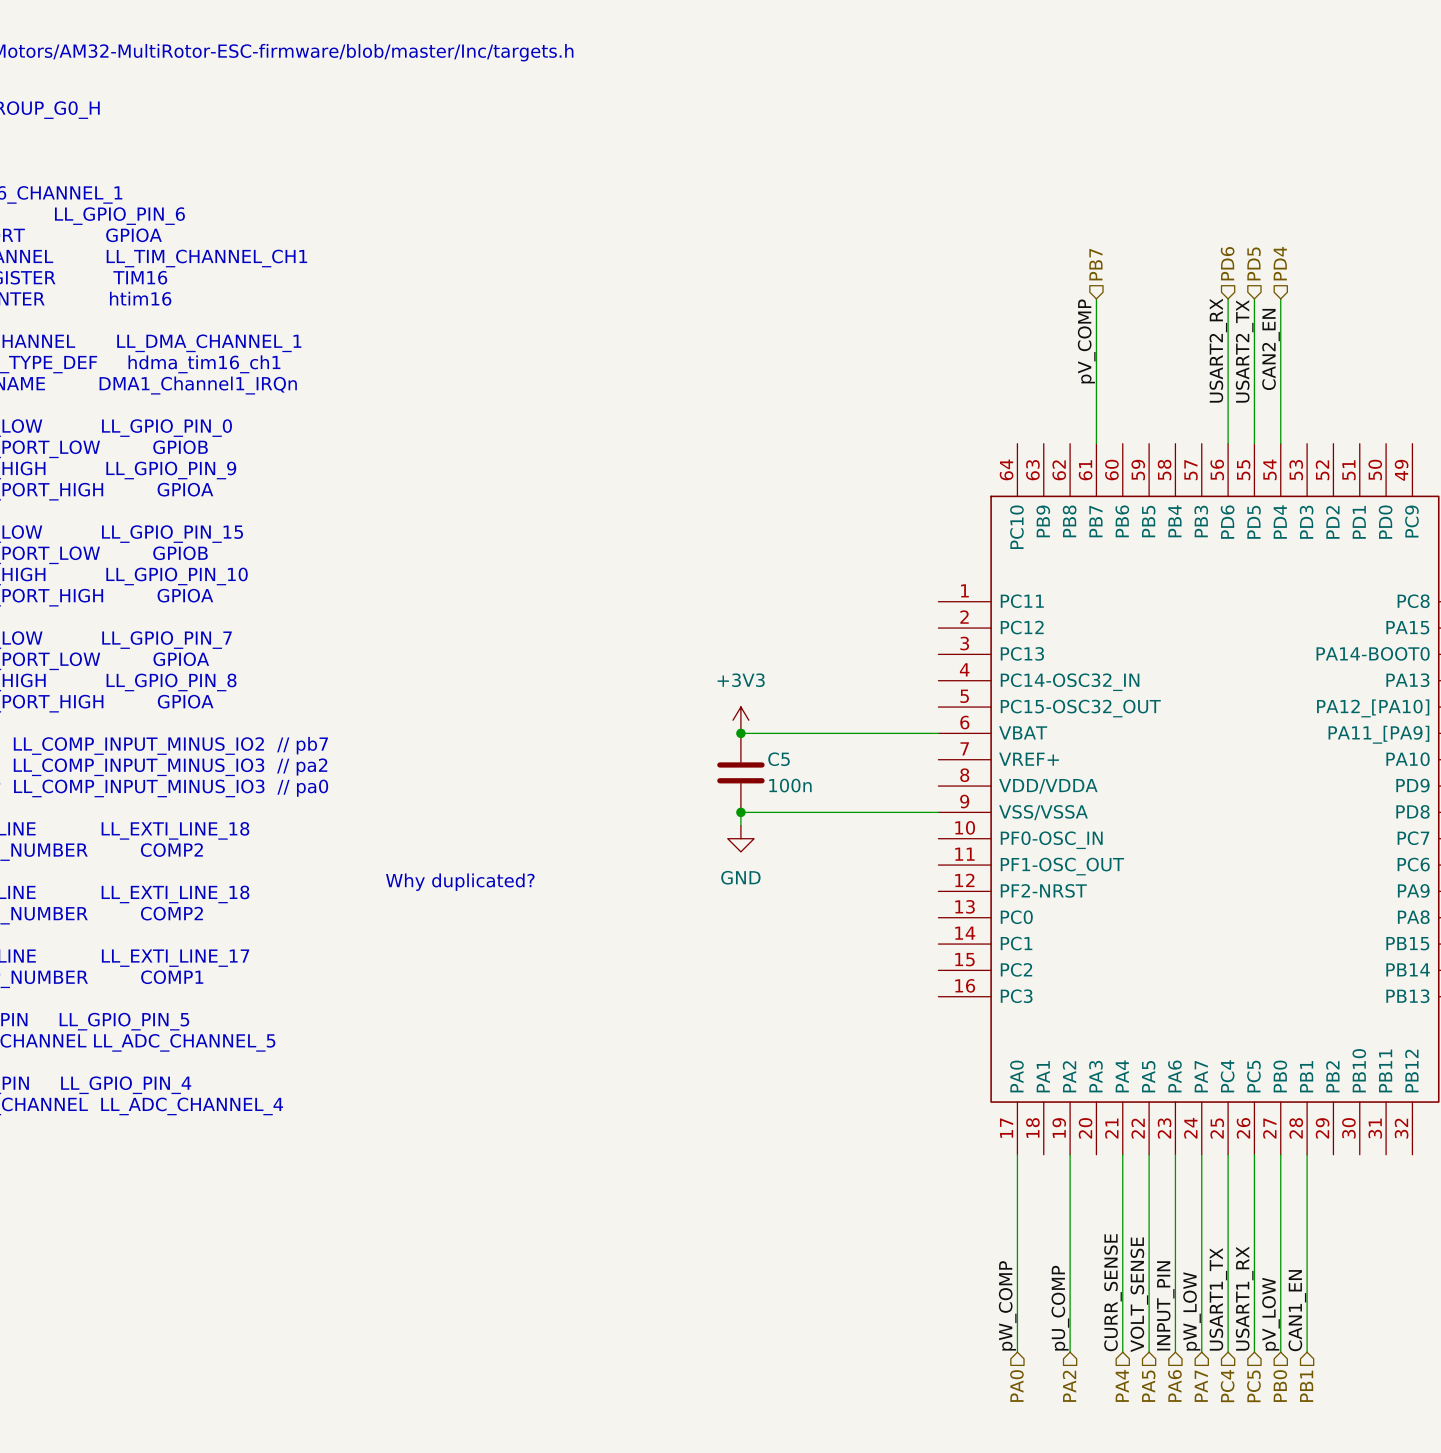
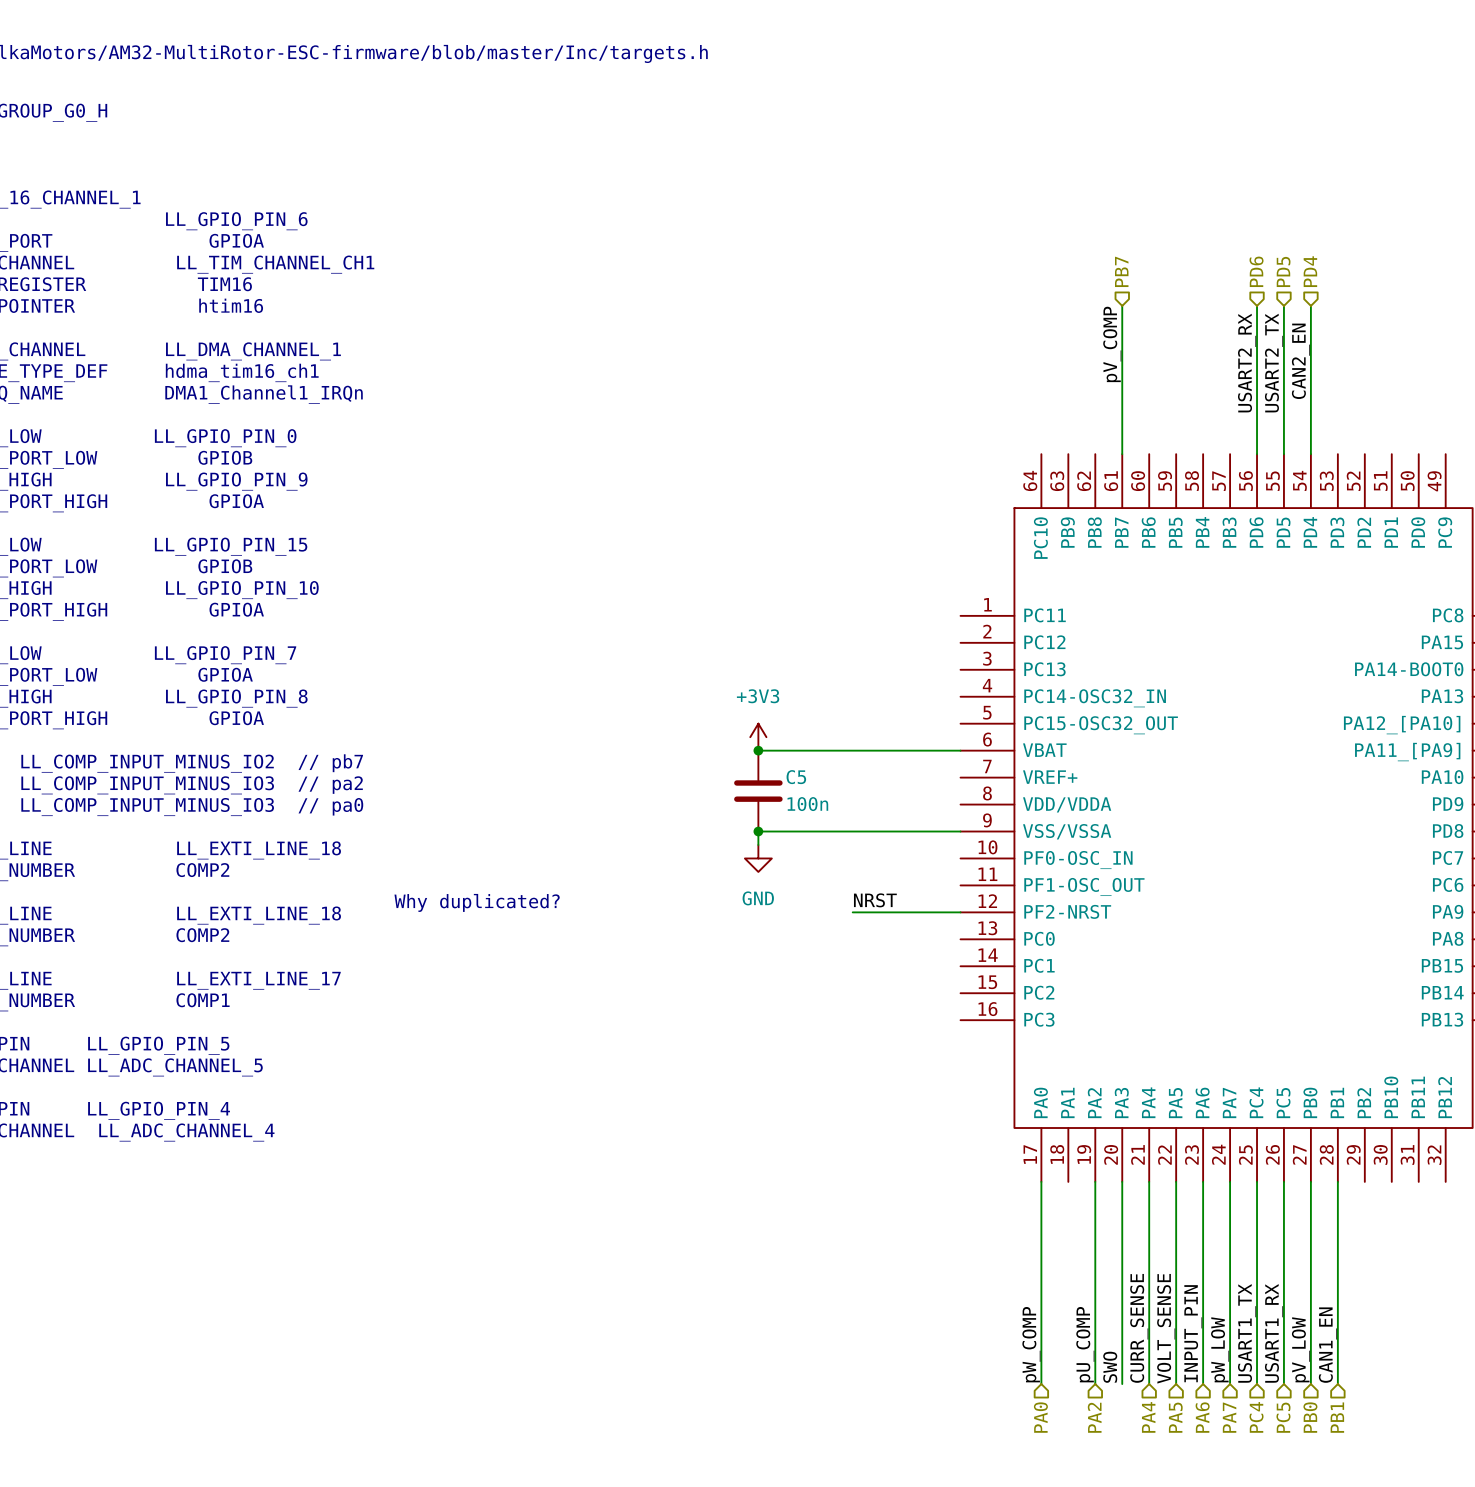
label: none -> NRST (875, 900)
wire: none -> (852, 912) (960, 912)
wire: none -> (1122, 1181) (1122, 1384)
label: none -> SWO (1110, 1367)

